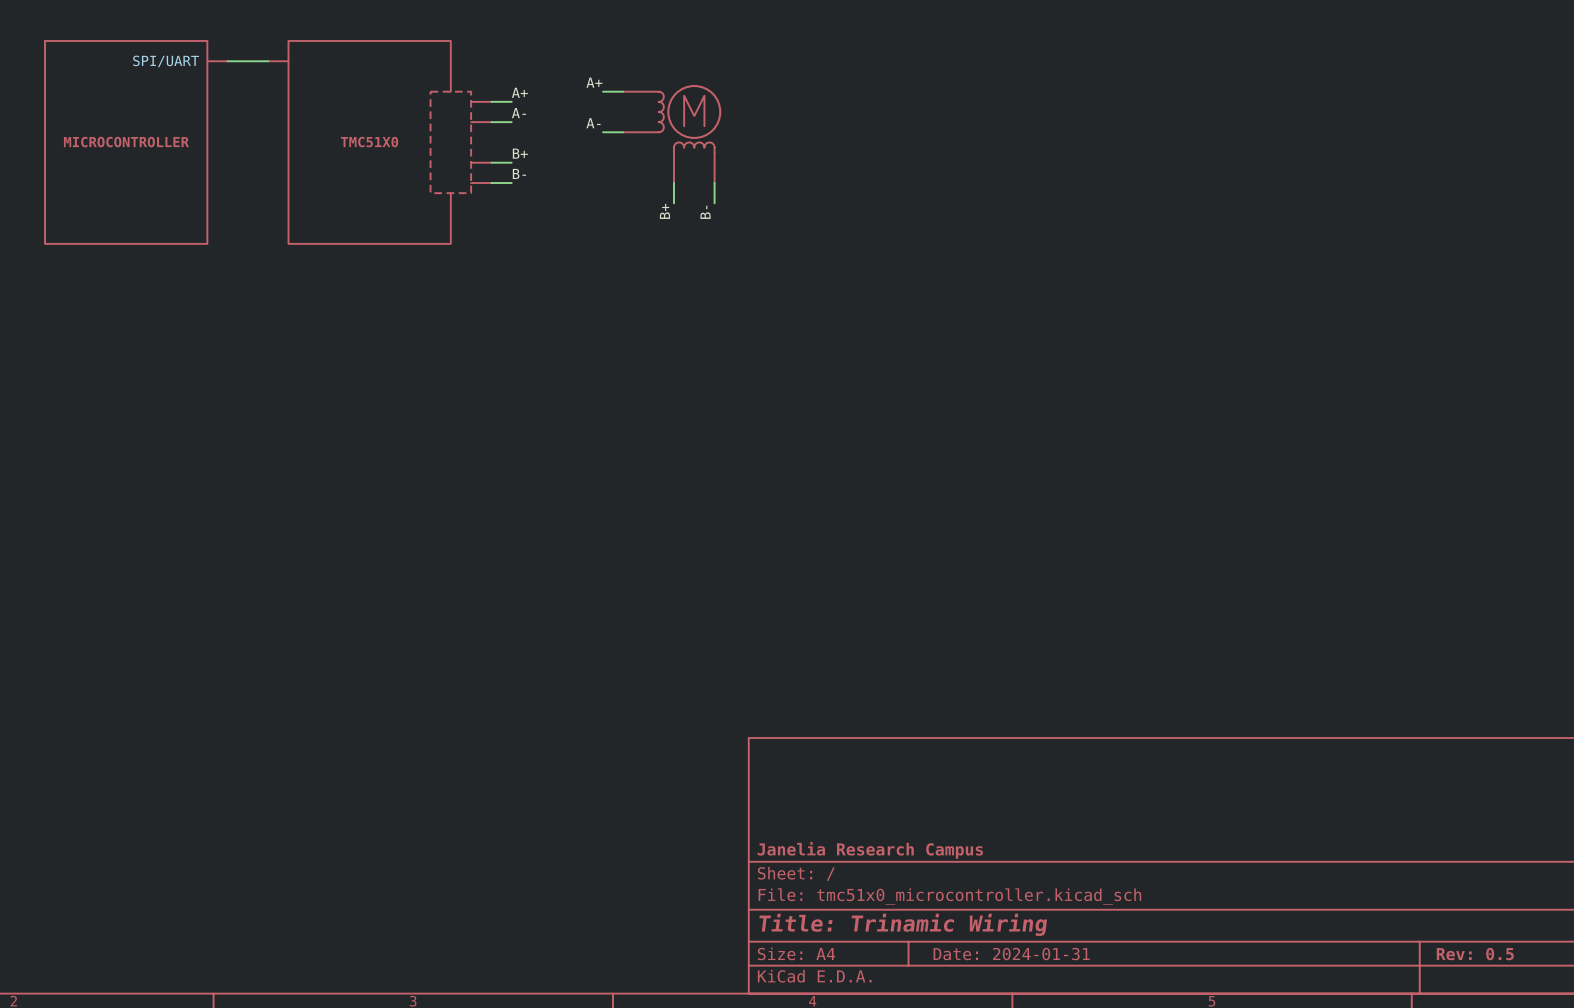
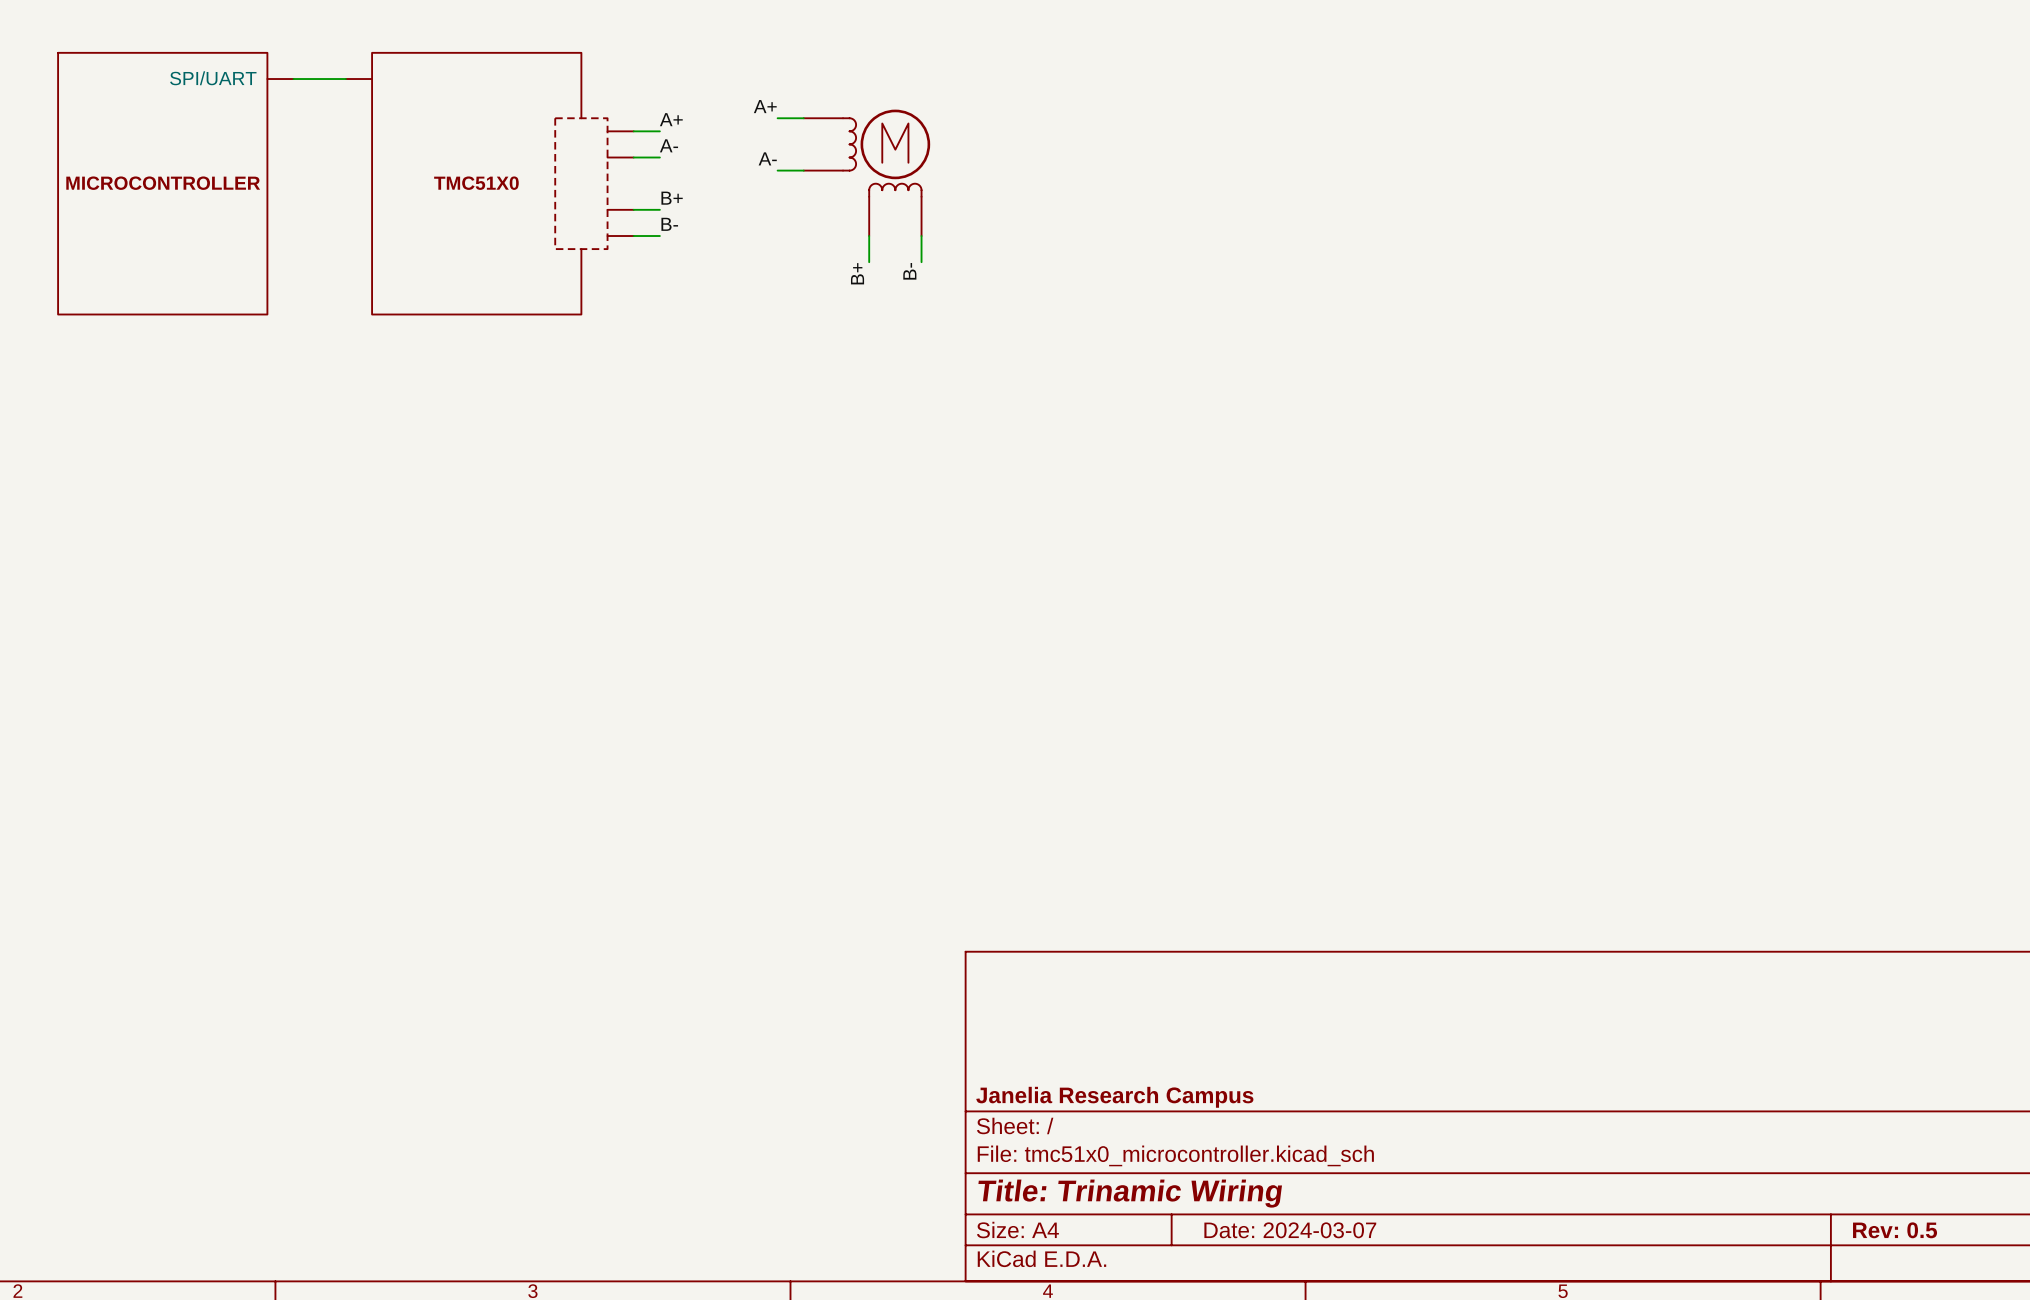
title block: Date: 2024-01-31 (1011, 954) -> Date: 2024-03-07 (1290, 1230)

